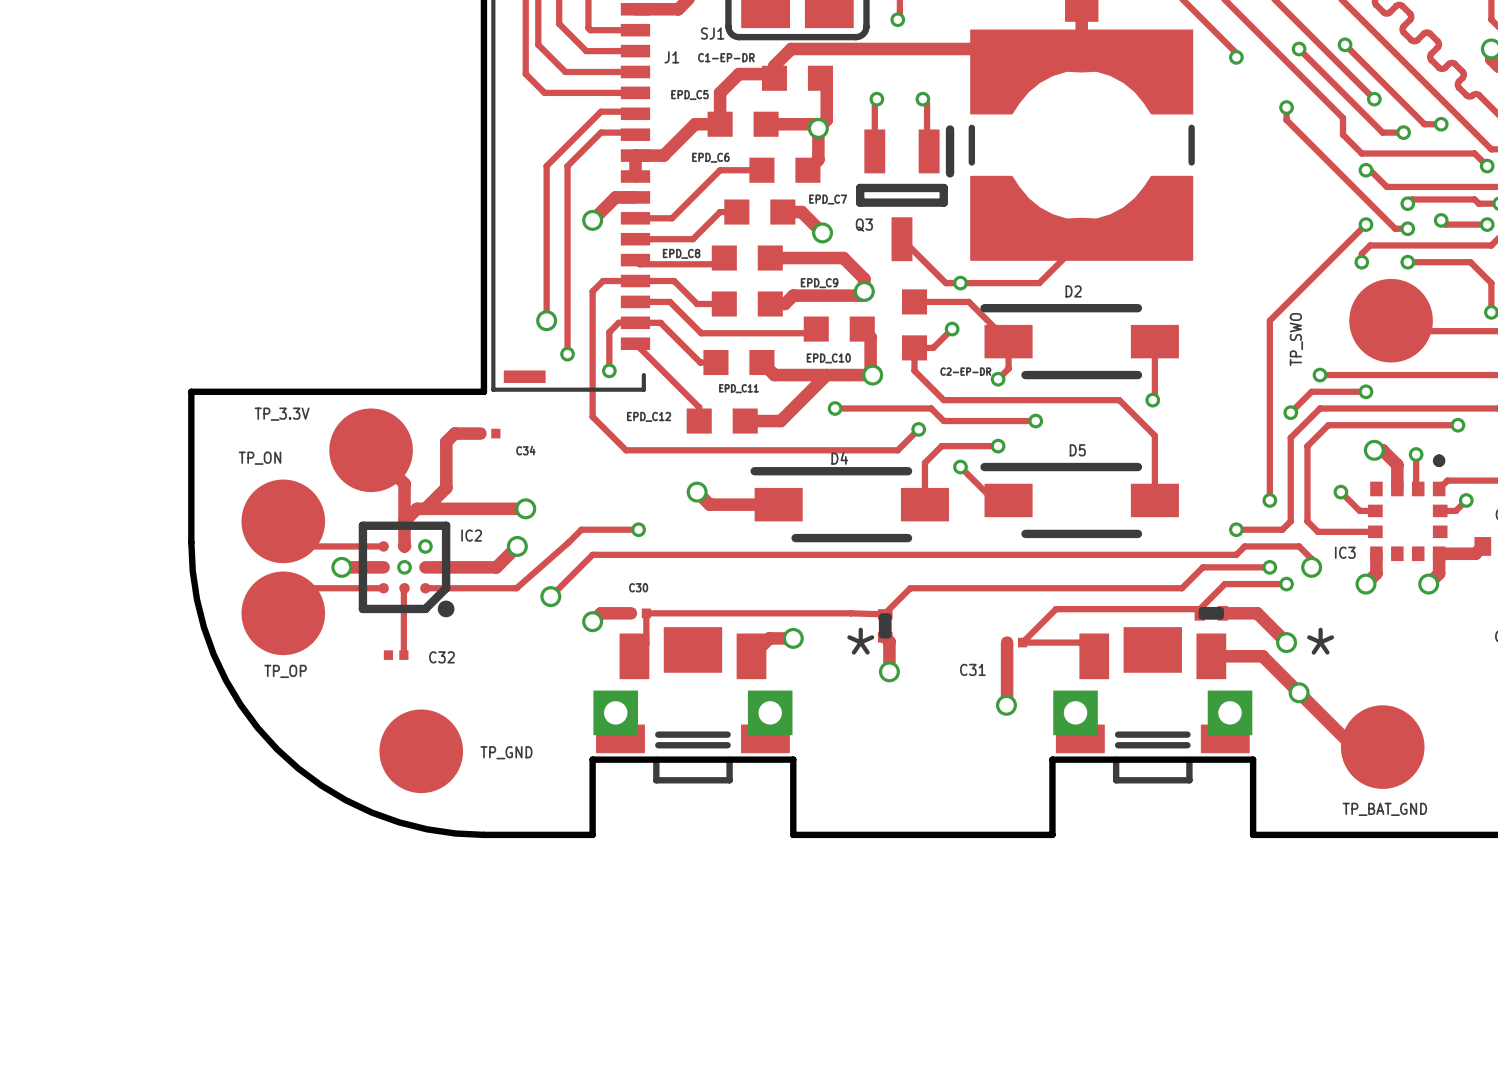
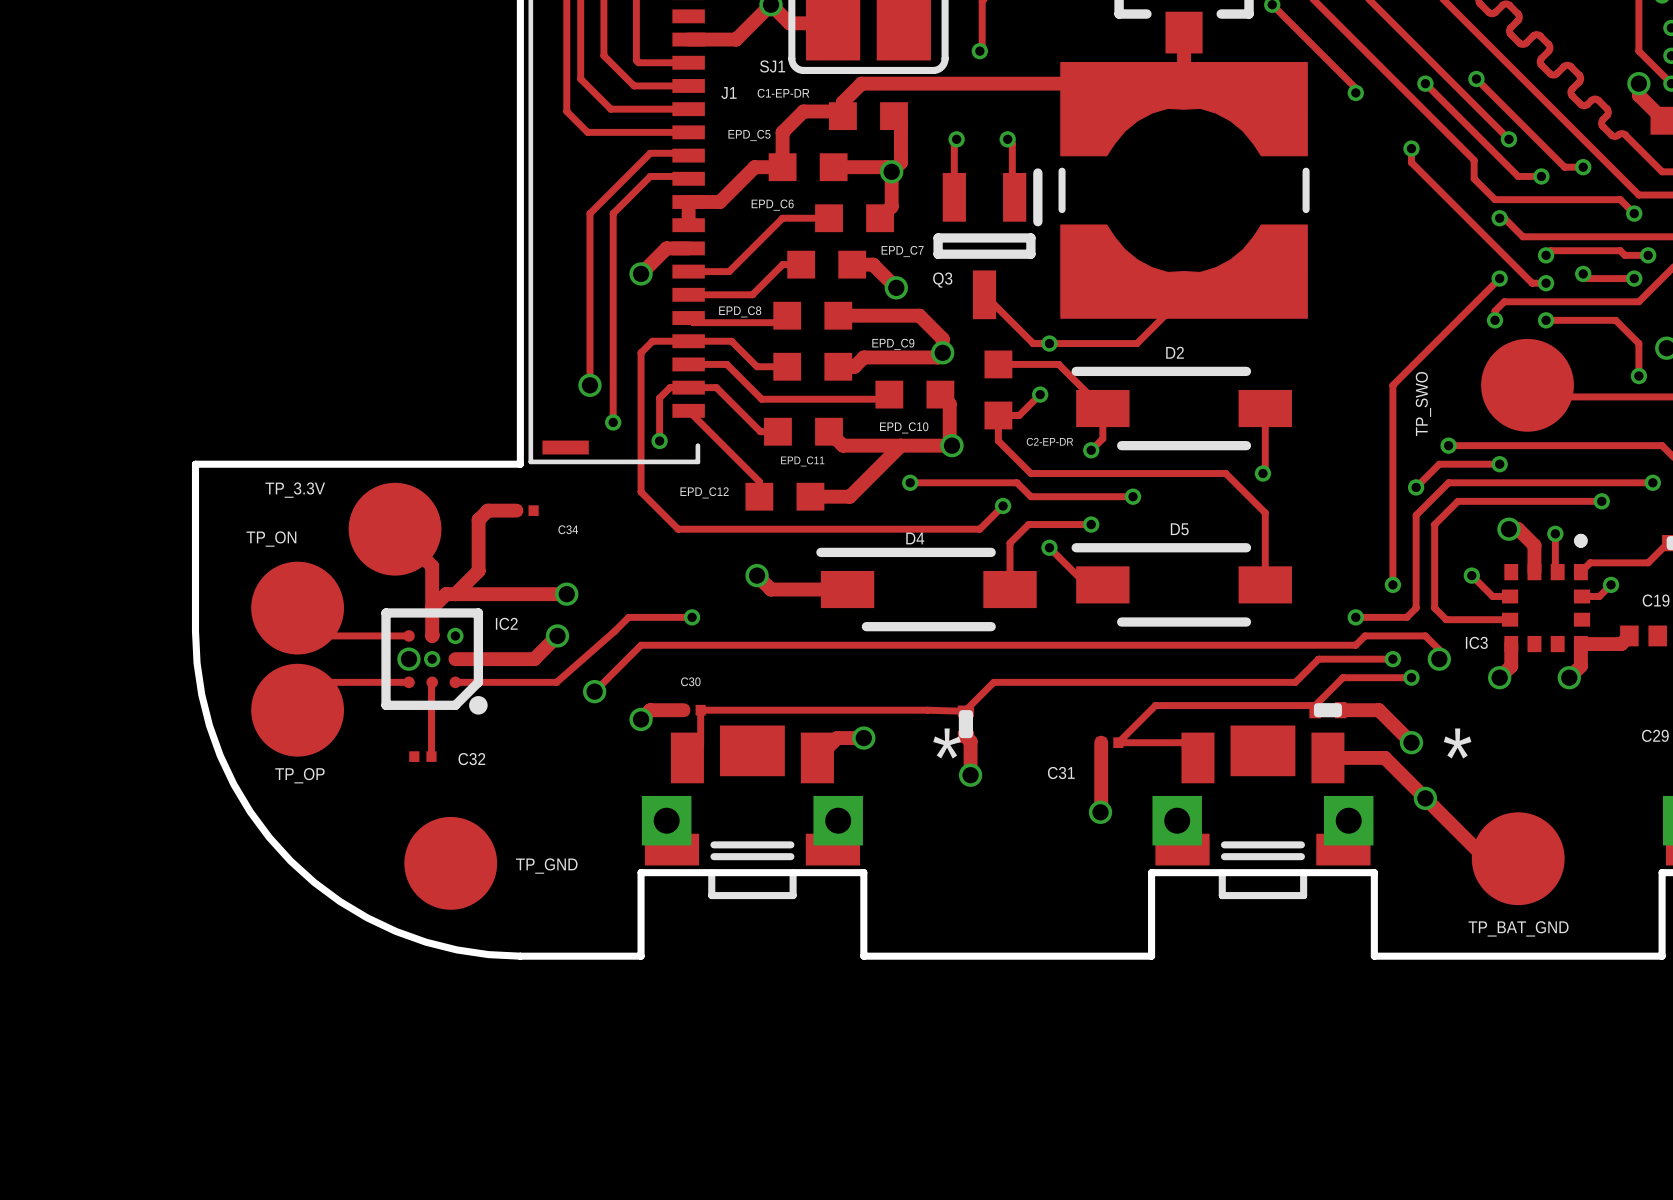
track: (341, 567) (383, 567) -> none
via position: (341, 567) -> (408, 659)

